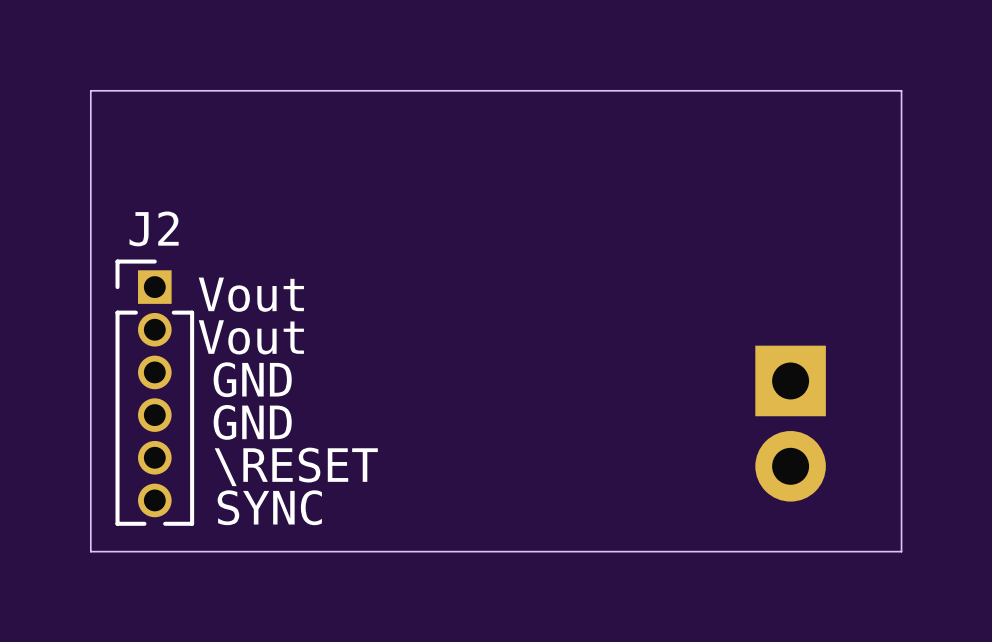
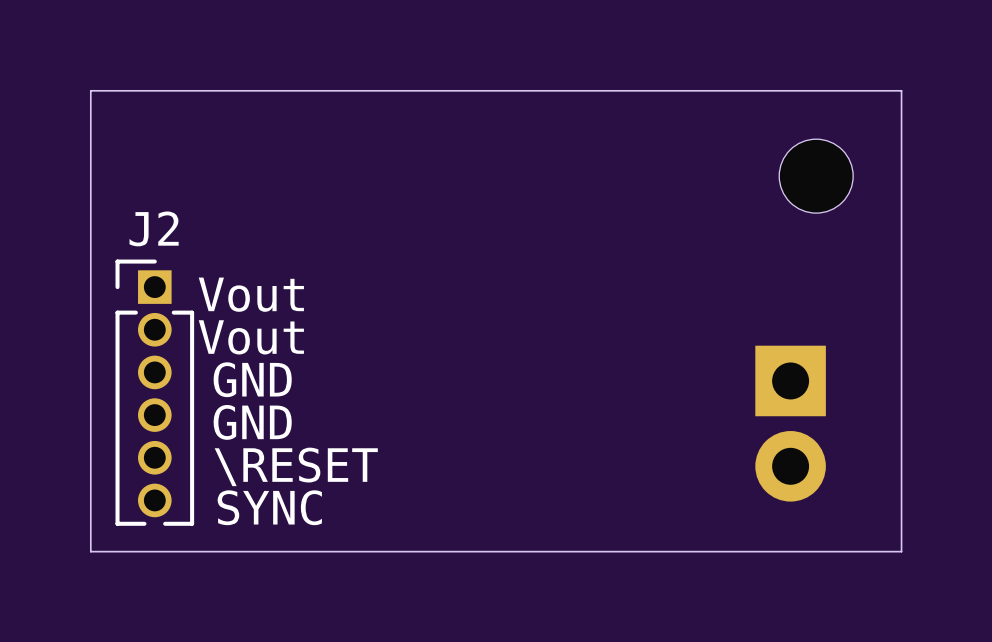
part: none -> (816, 176)

